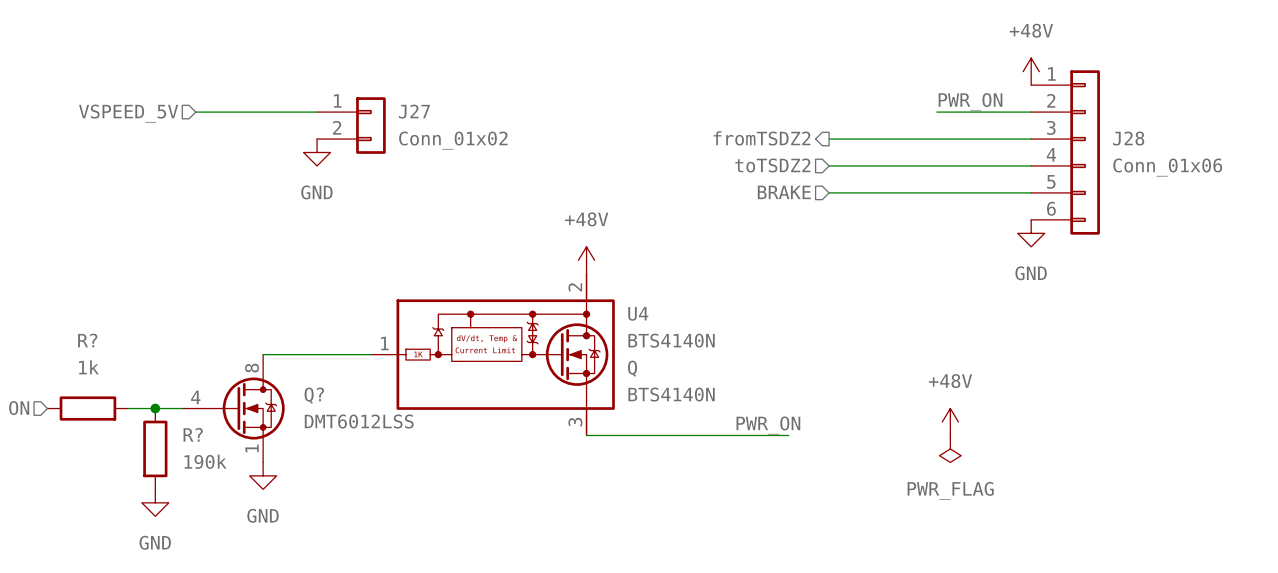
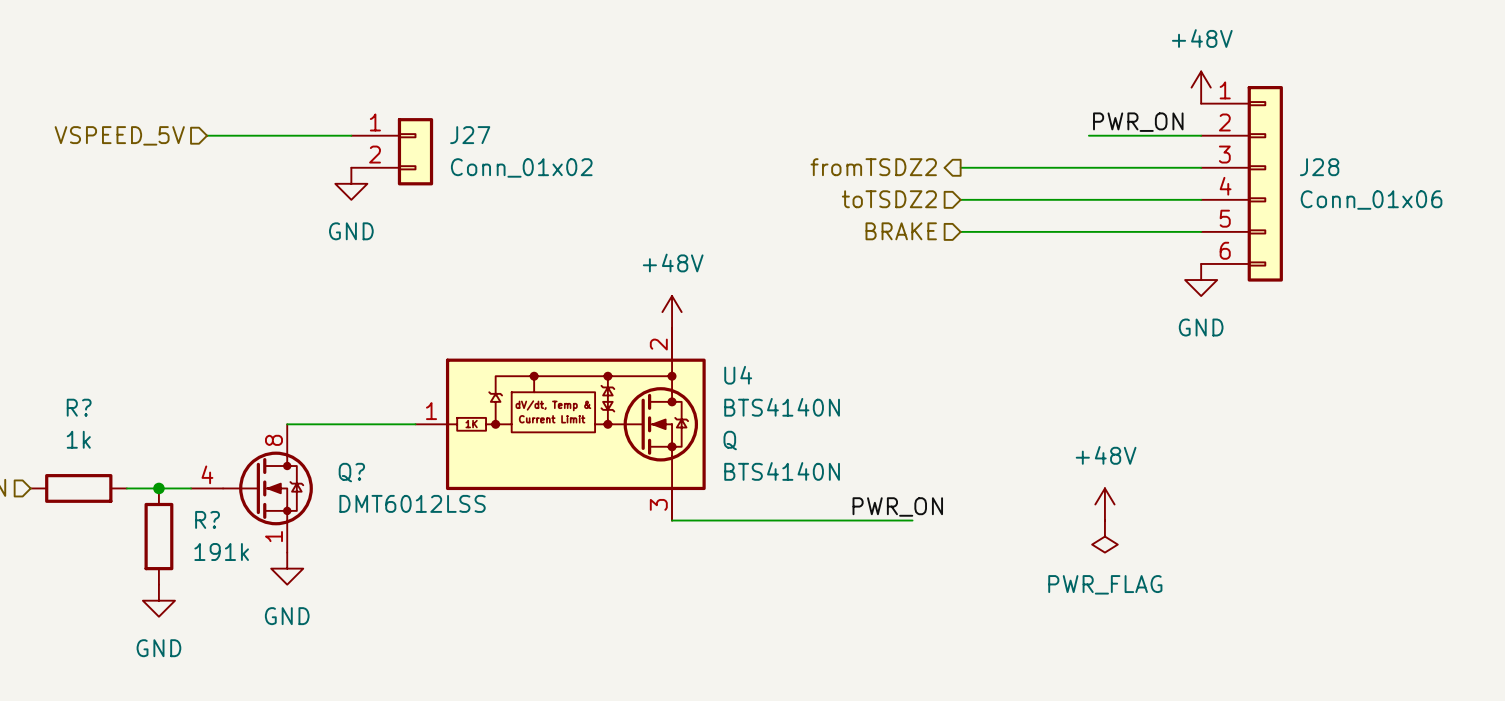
R? value: 190k (205, 461) -> 191k (221, 551)

